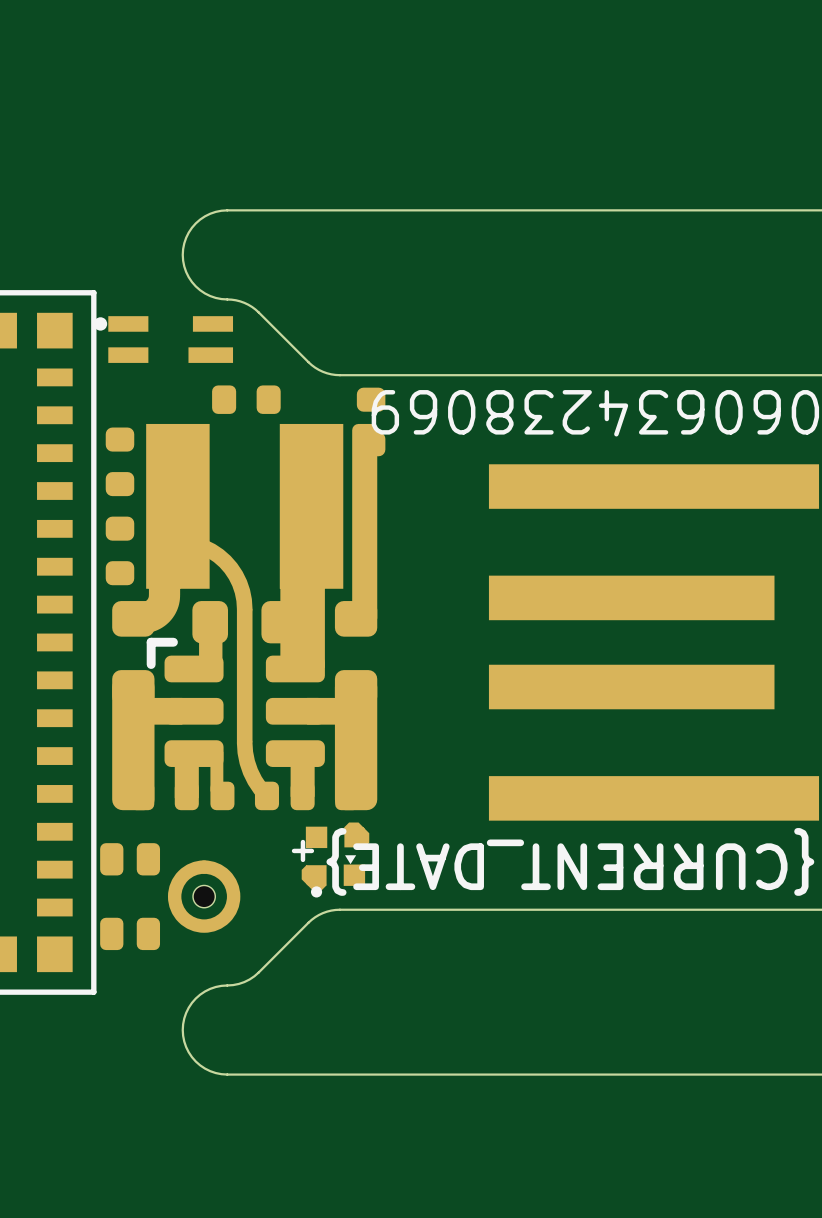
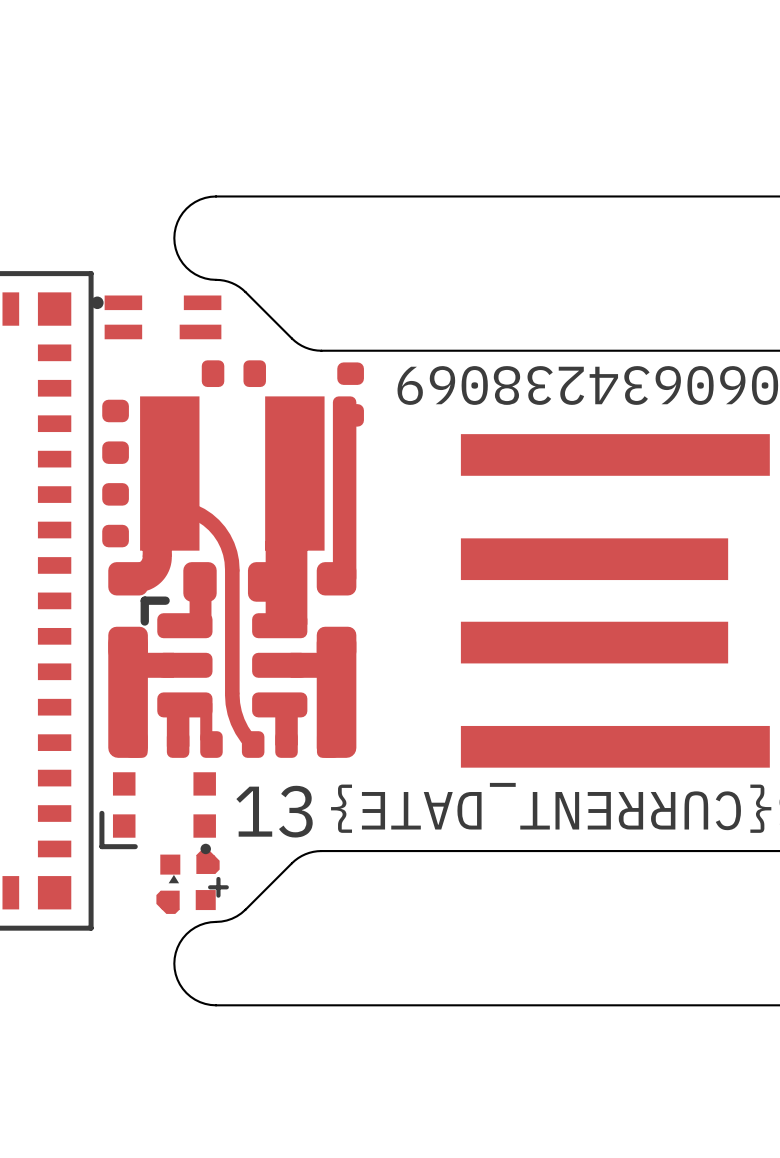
part rotation: 0° (330, 860) -> 180° (192, 878)
part position: (330, 860) -> (192, 878)
part: none -> (157, 810)
text: none -> 13 (274, 811)
part: (170, 896) -> none

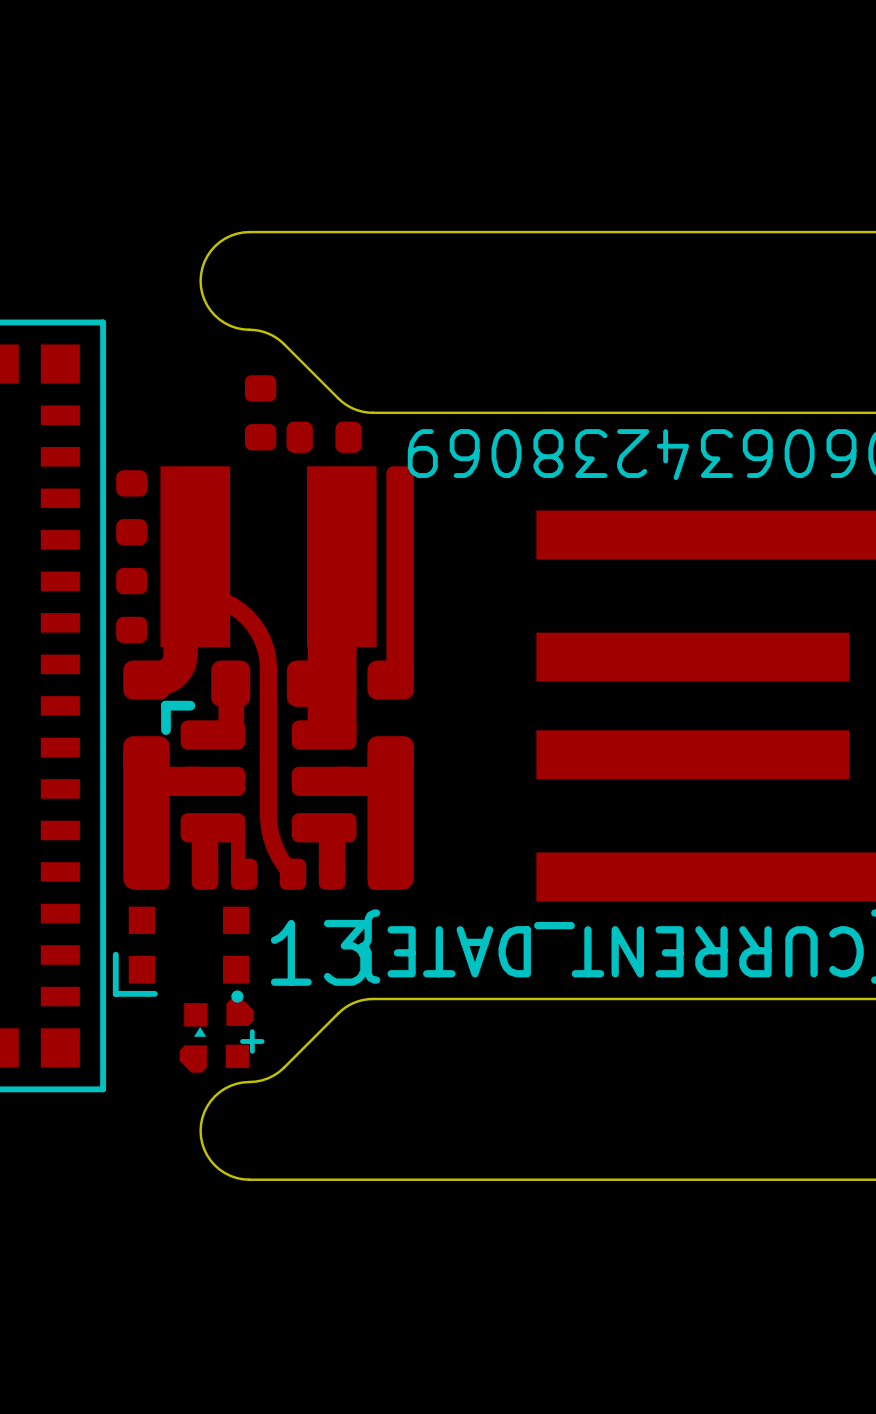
part: (156, 317) -> none
part rotation: 0° (233, 373) -> 90° clockwise (260, 412)
part rotation: 0° (350, 394) -> 90° clockwise (324, 437)
part position: (350, 394) -> (324, 437)

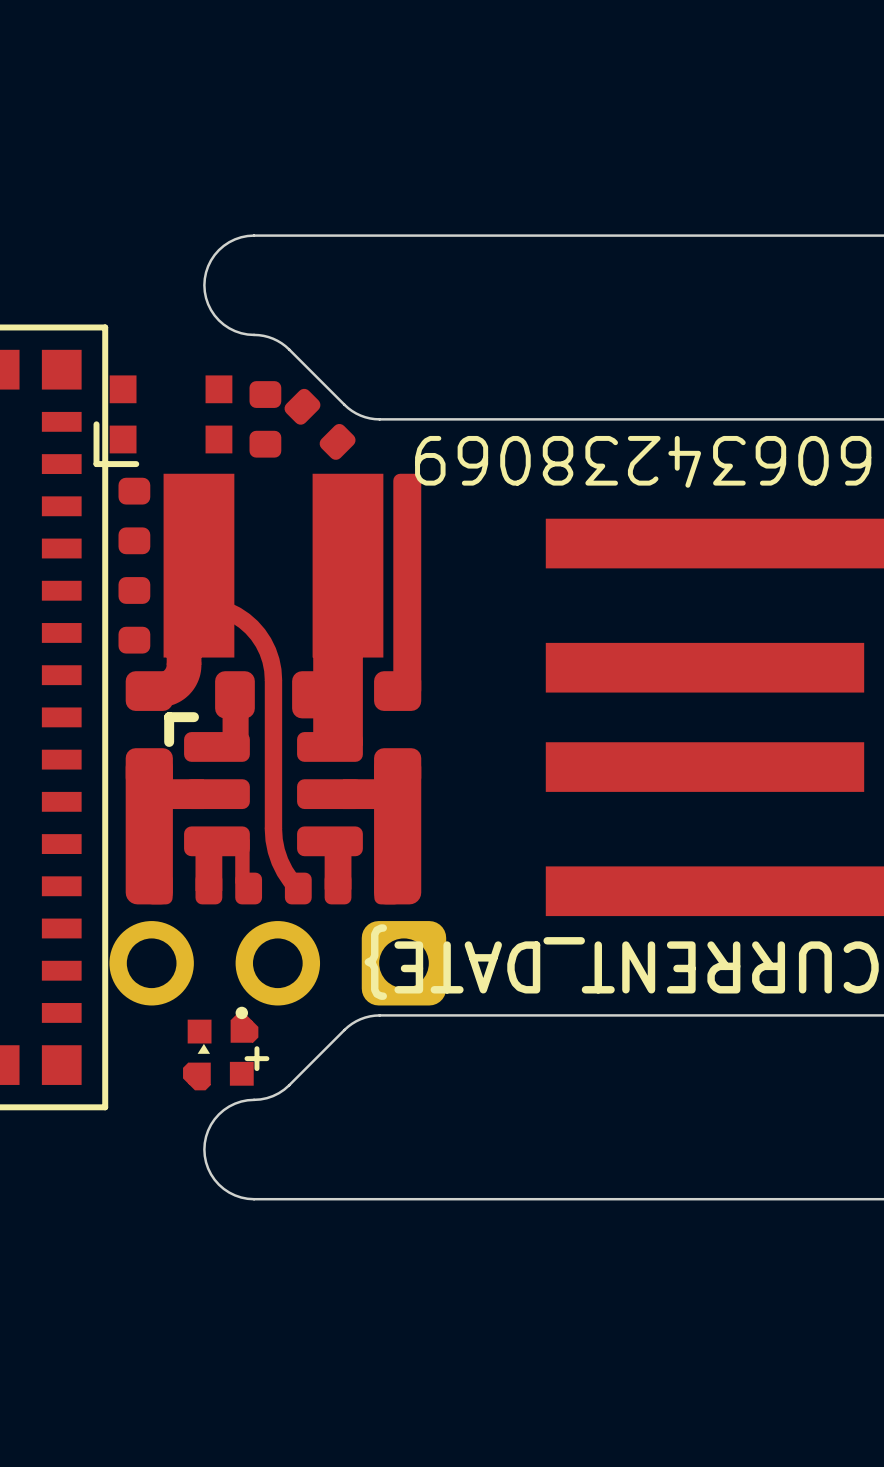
part footprint: [286, 421, 362, 453] -> [284, 388, 356, 460]
part: none -> (277, 963)
part position: (181, 951) -> (162, 421)
text: 13 (319, 952) -> none

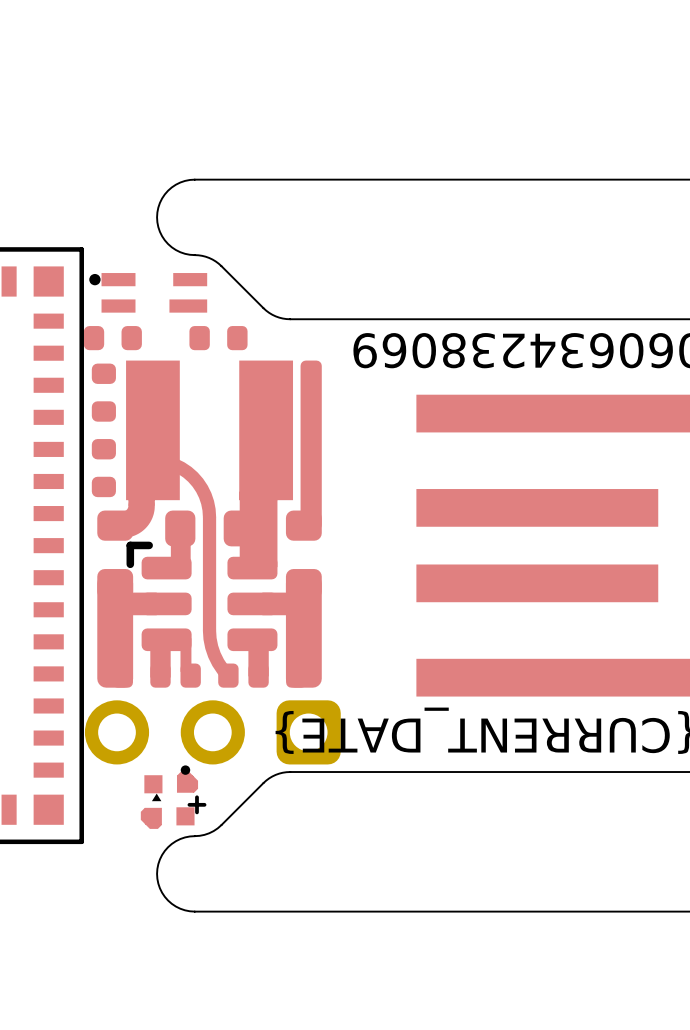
part: none -> (148, 292)
part rotation: 0° (265, 419) -> 90° clockwise (218, 338)
part: (162, 421) -> none
part: (320, 424) -> none
part: none -> (112, 338)

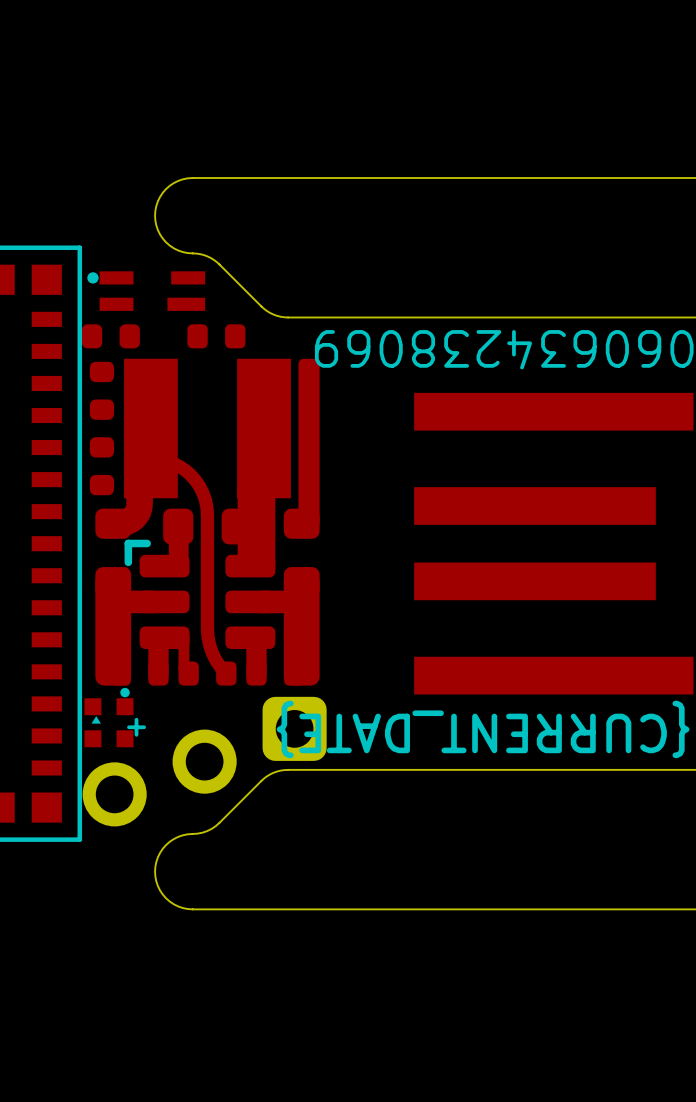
part: none -> (115, 717)
part: (212, 732) -> none
part: none -> (204, 761)
part: (173, 797) -> none

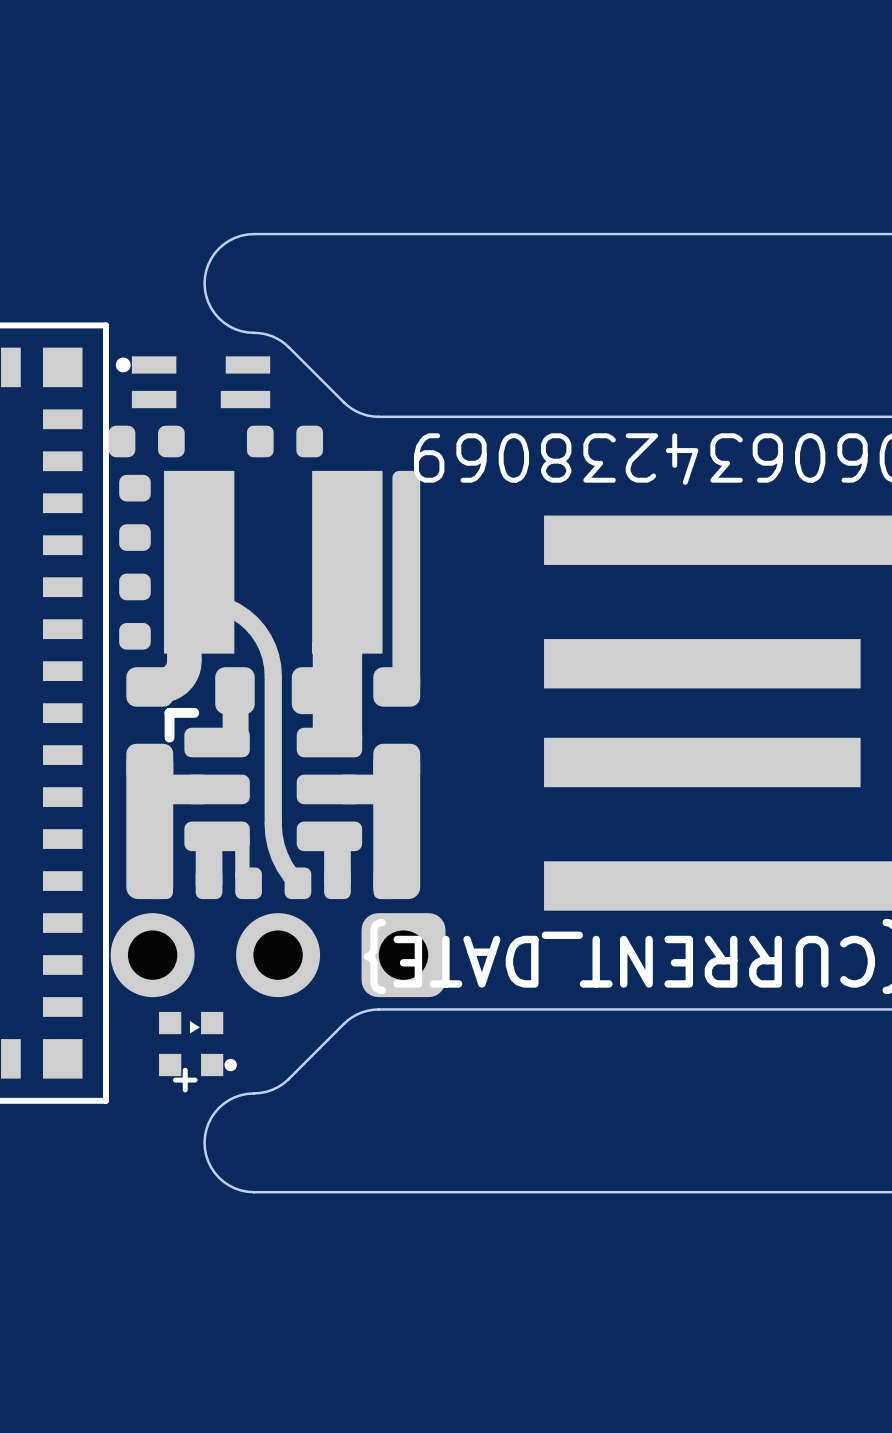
part rotation: 0° (115, 717) -> 90° clockwise (197, 1052)
part position: (115, 717) -> (197, 1052)
part: none -> (278, 955)
part: (204, 761) -> none

